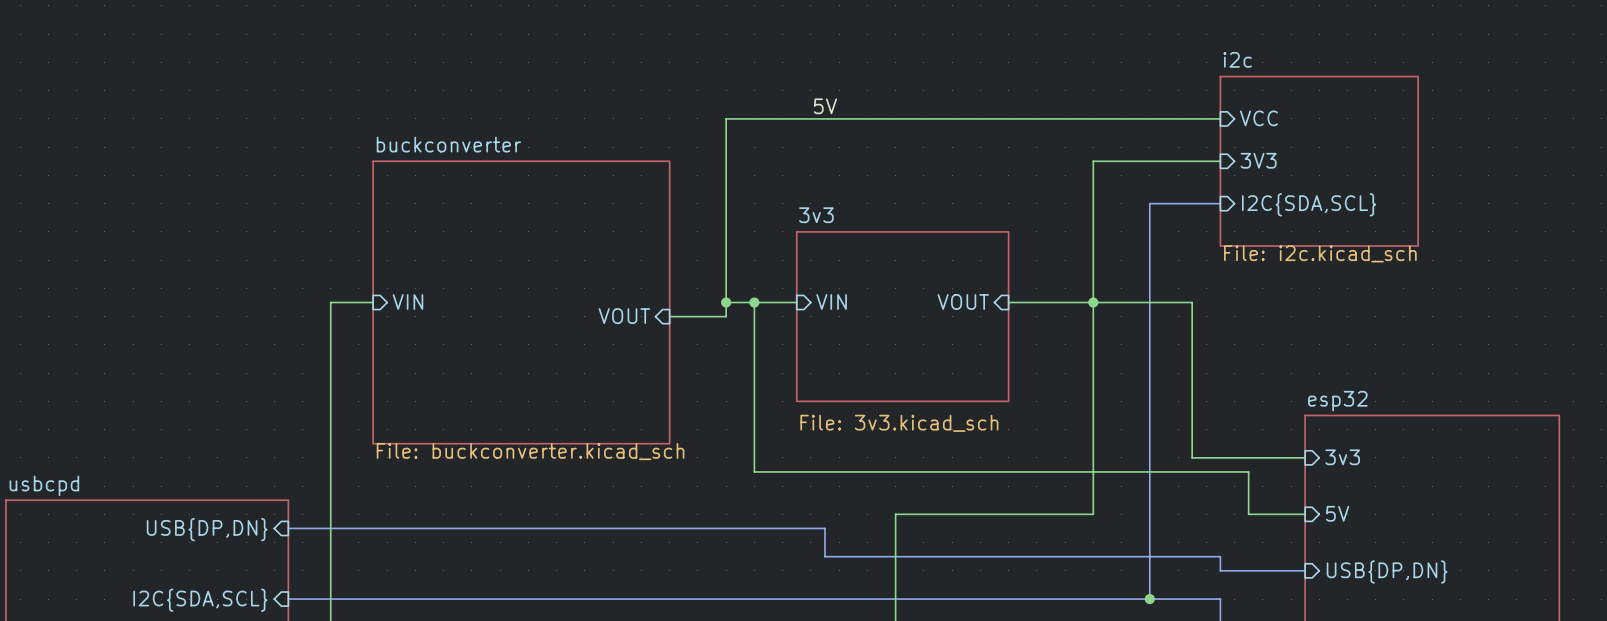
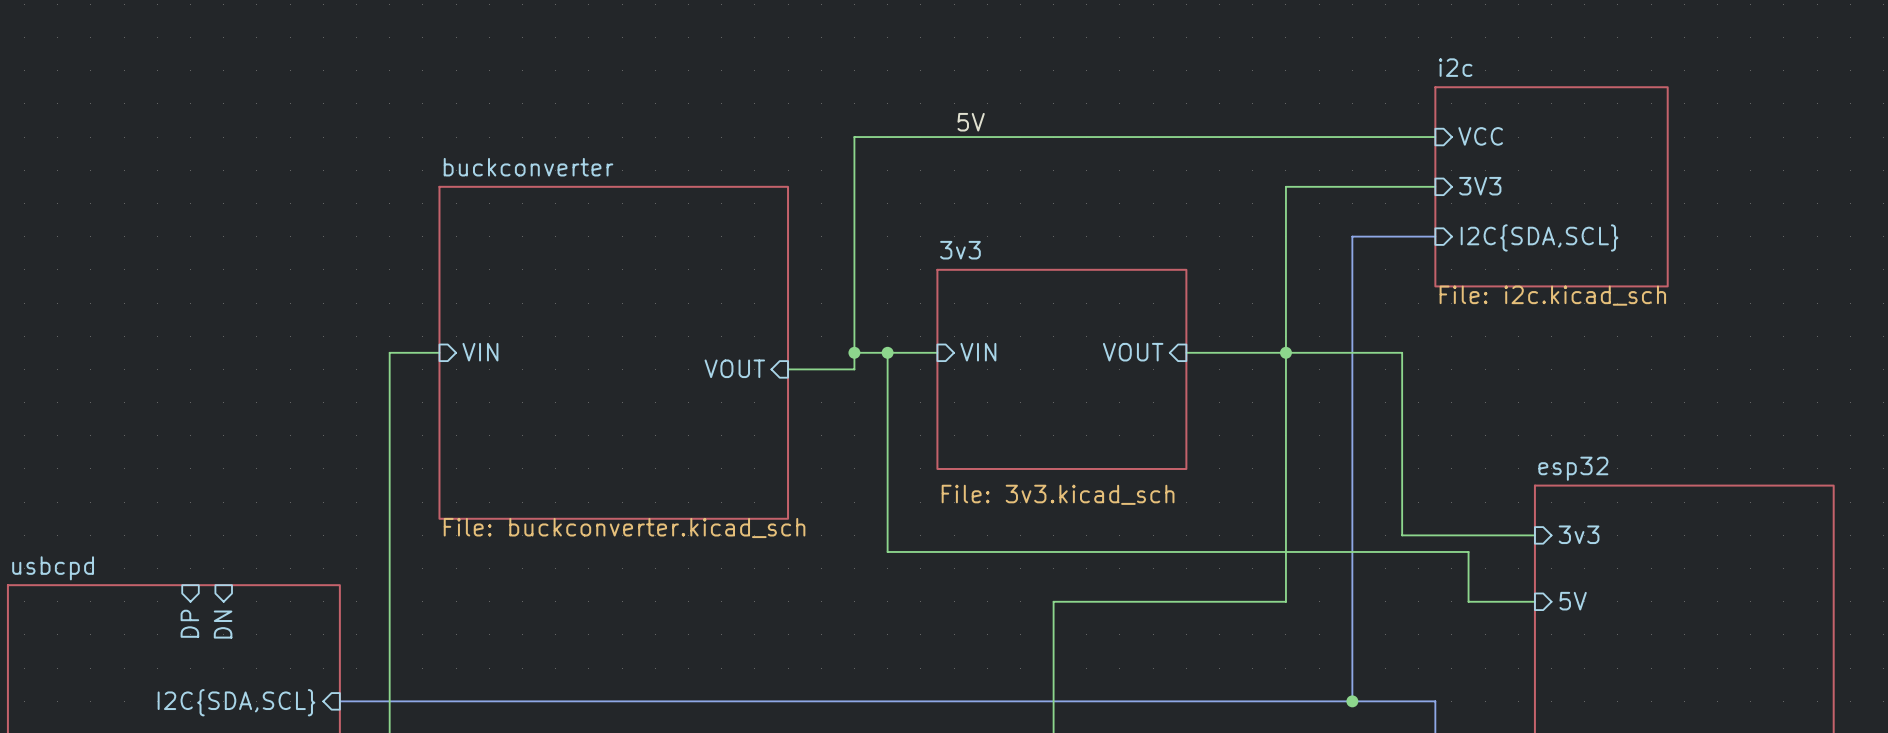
bus: (288, 528) (824, 528) (824, 556) (1220, 556) (1220, 570) (1305, 570) -> none
sheet pin: USB{DP,DN} (207, 529) -> none
sheet pin: none -> DP (189, 623)
sheet pin: none -> DN (223, 624)
sheet pin: USB{DP,DN} (1387, 571) -> none

